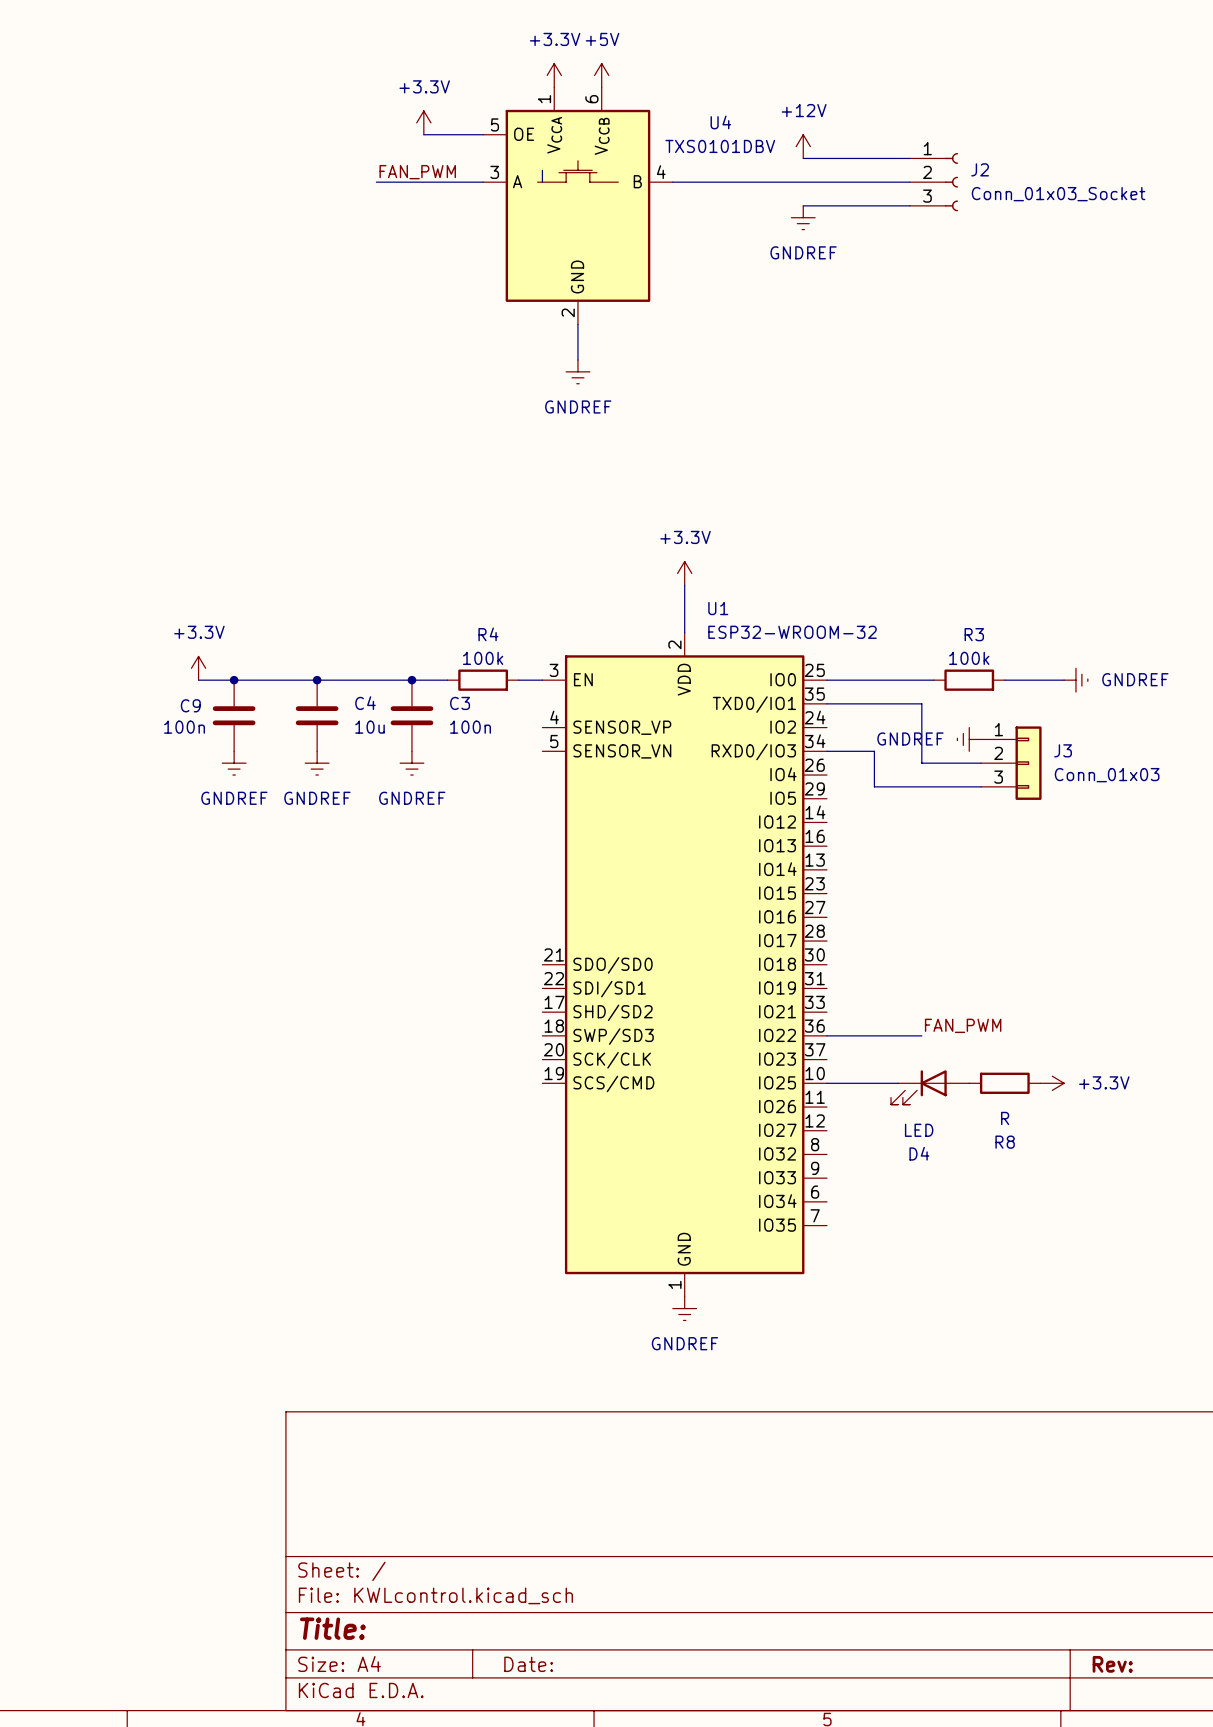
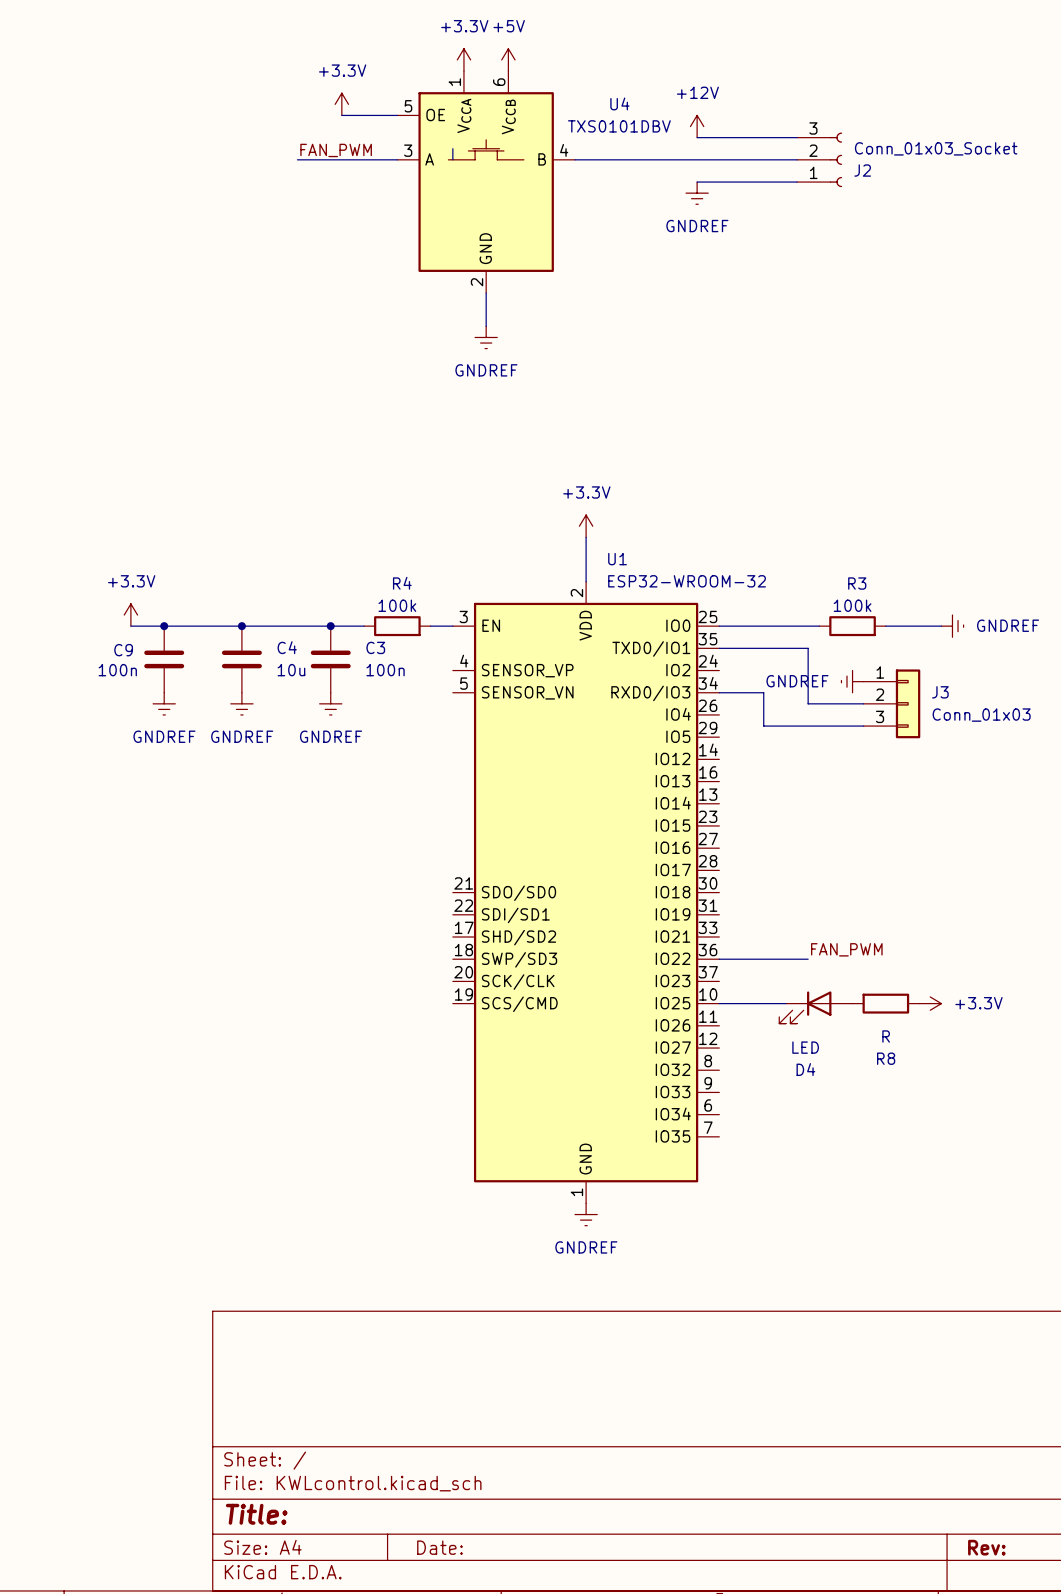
J2 flip: as is (951, 182) -> up-down (835, 159)

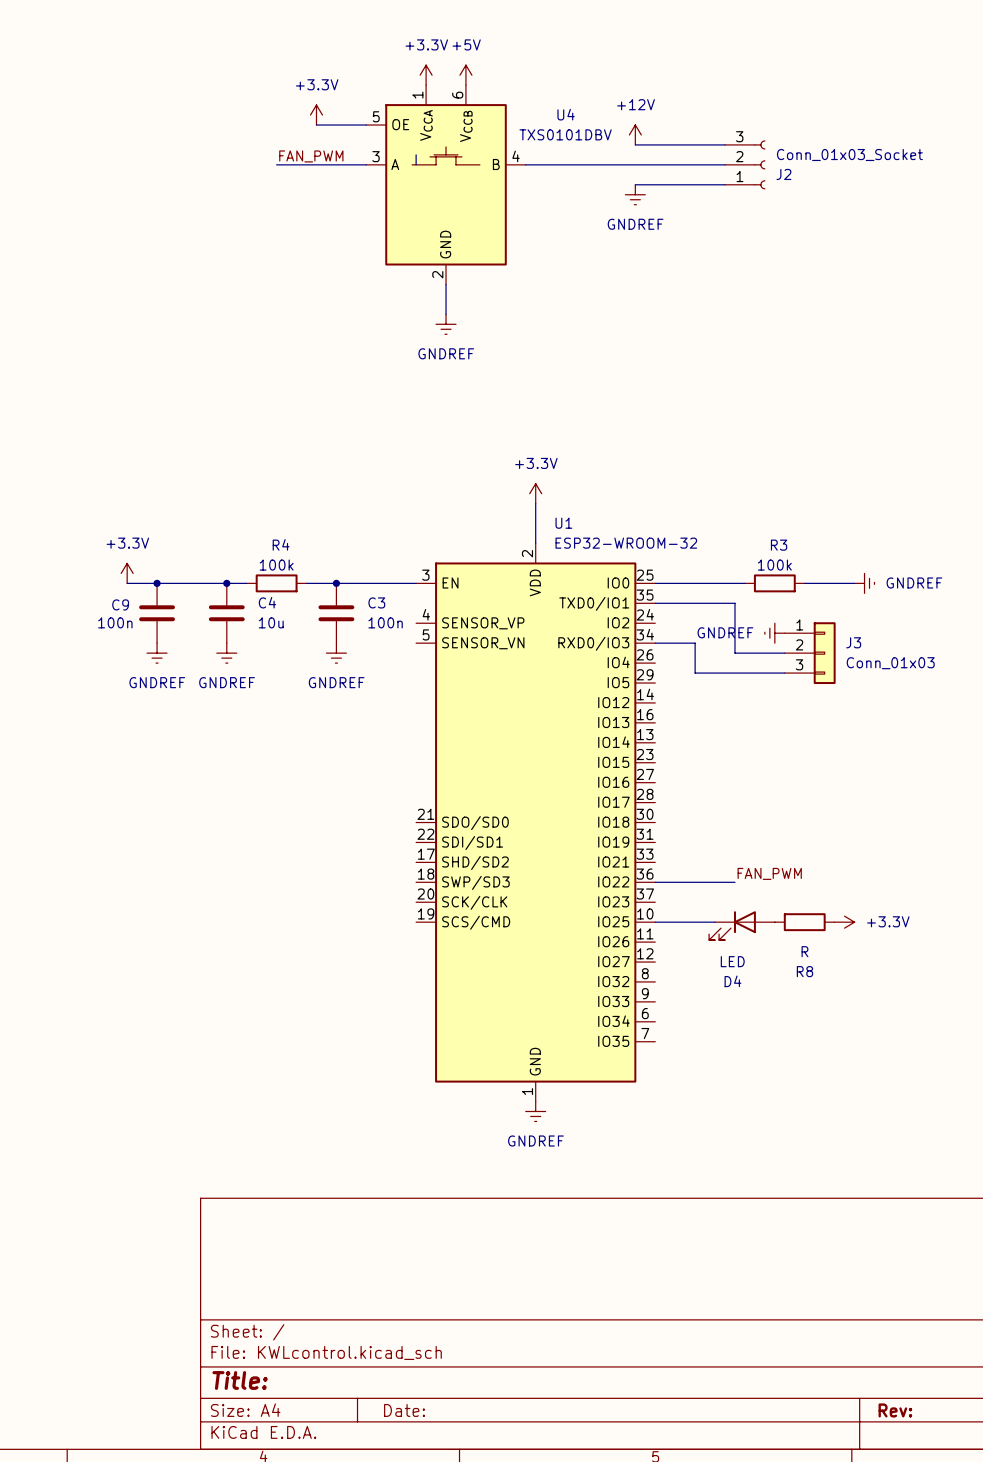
wire: (264, 626) (330, 626) -> (336, 583) (396, 583)
junction position: (330, 626) -> (336, 583)
R4 position: (397, 626) -> (276, 583)
C3 position: (330, 659) -> (336, 613)
power symbol position: GNDREF (330, 703) -> GNDREF (336, 653)

